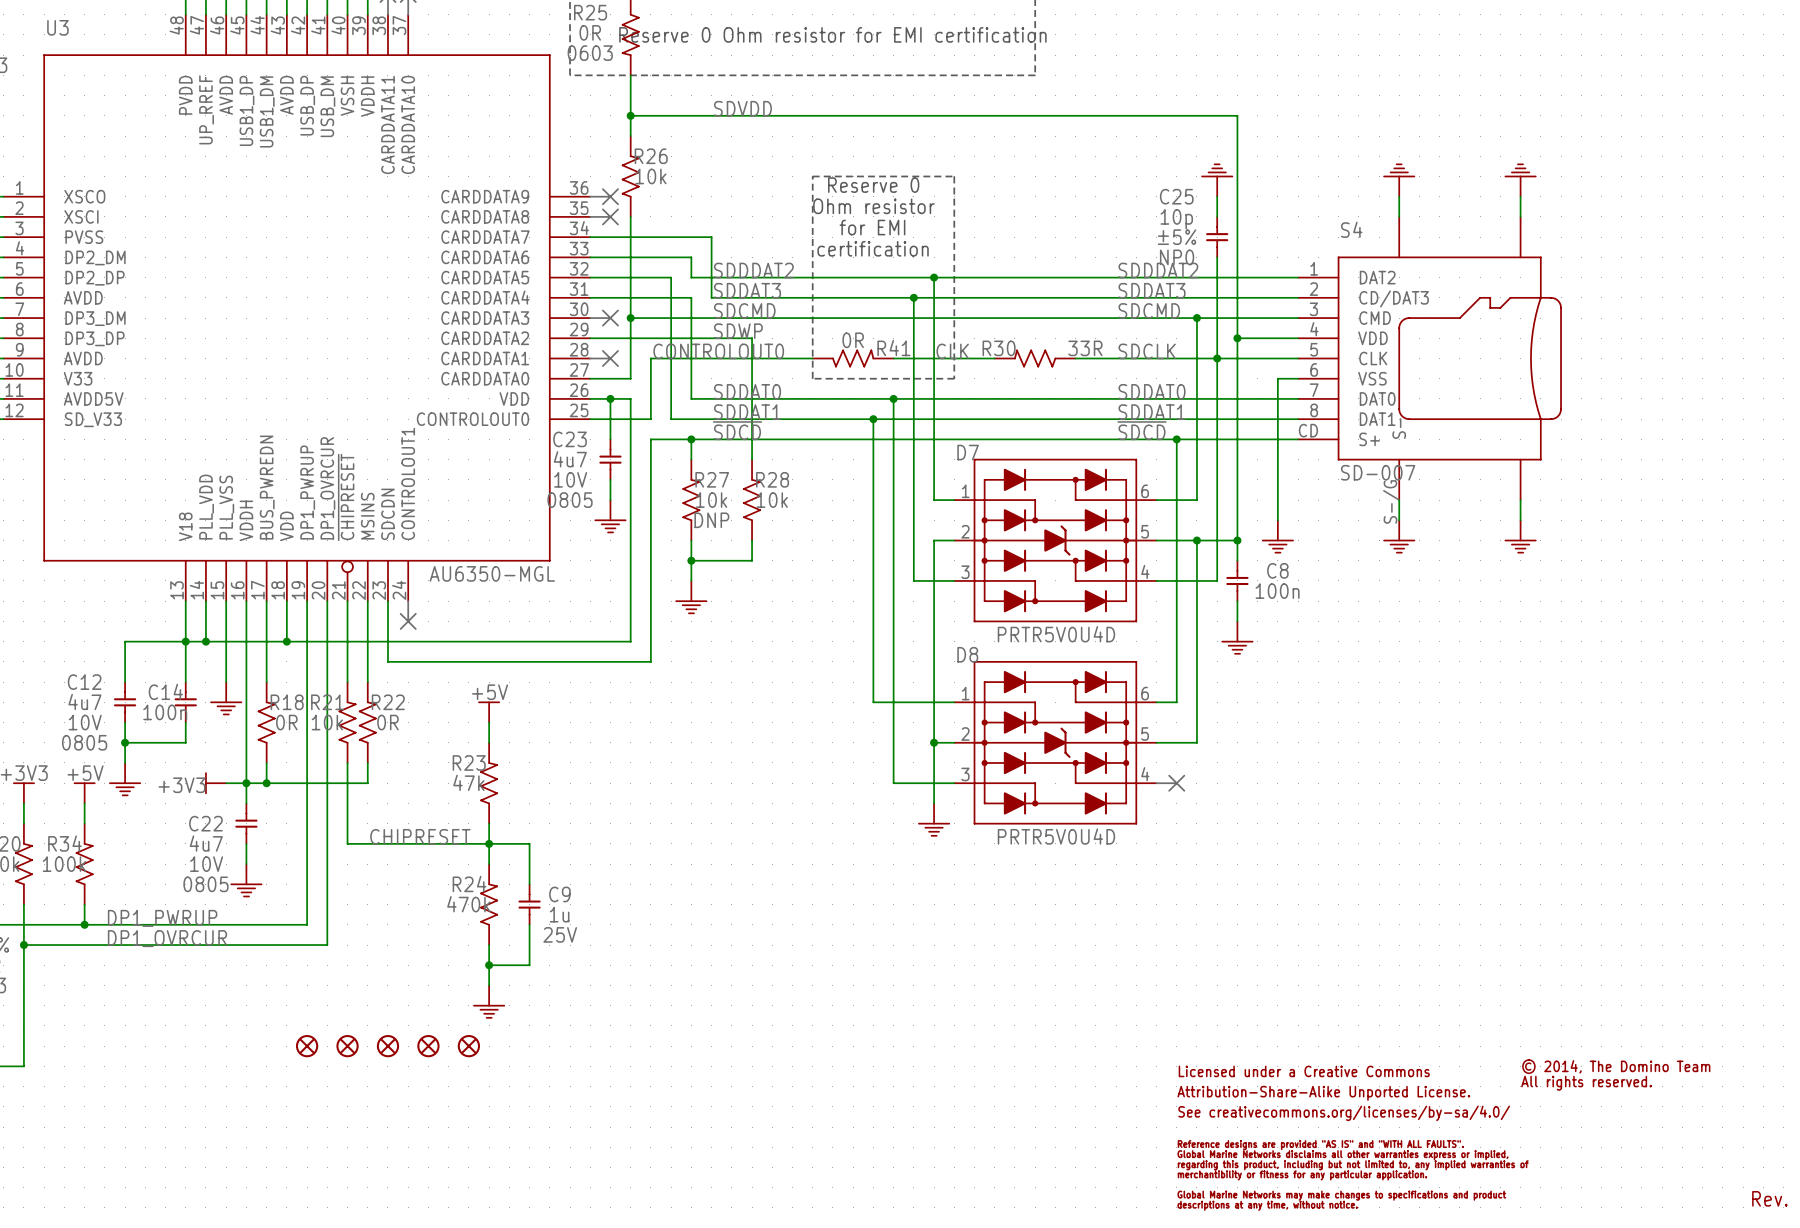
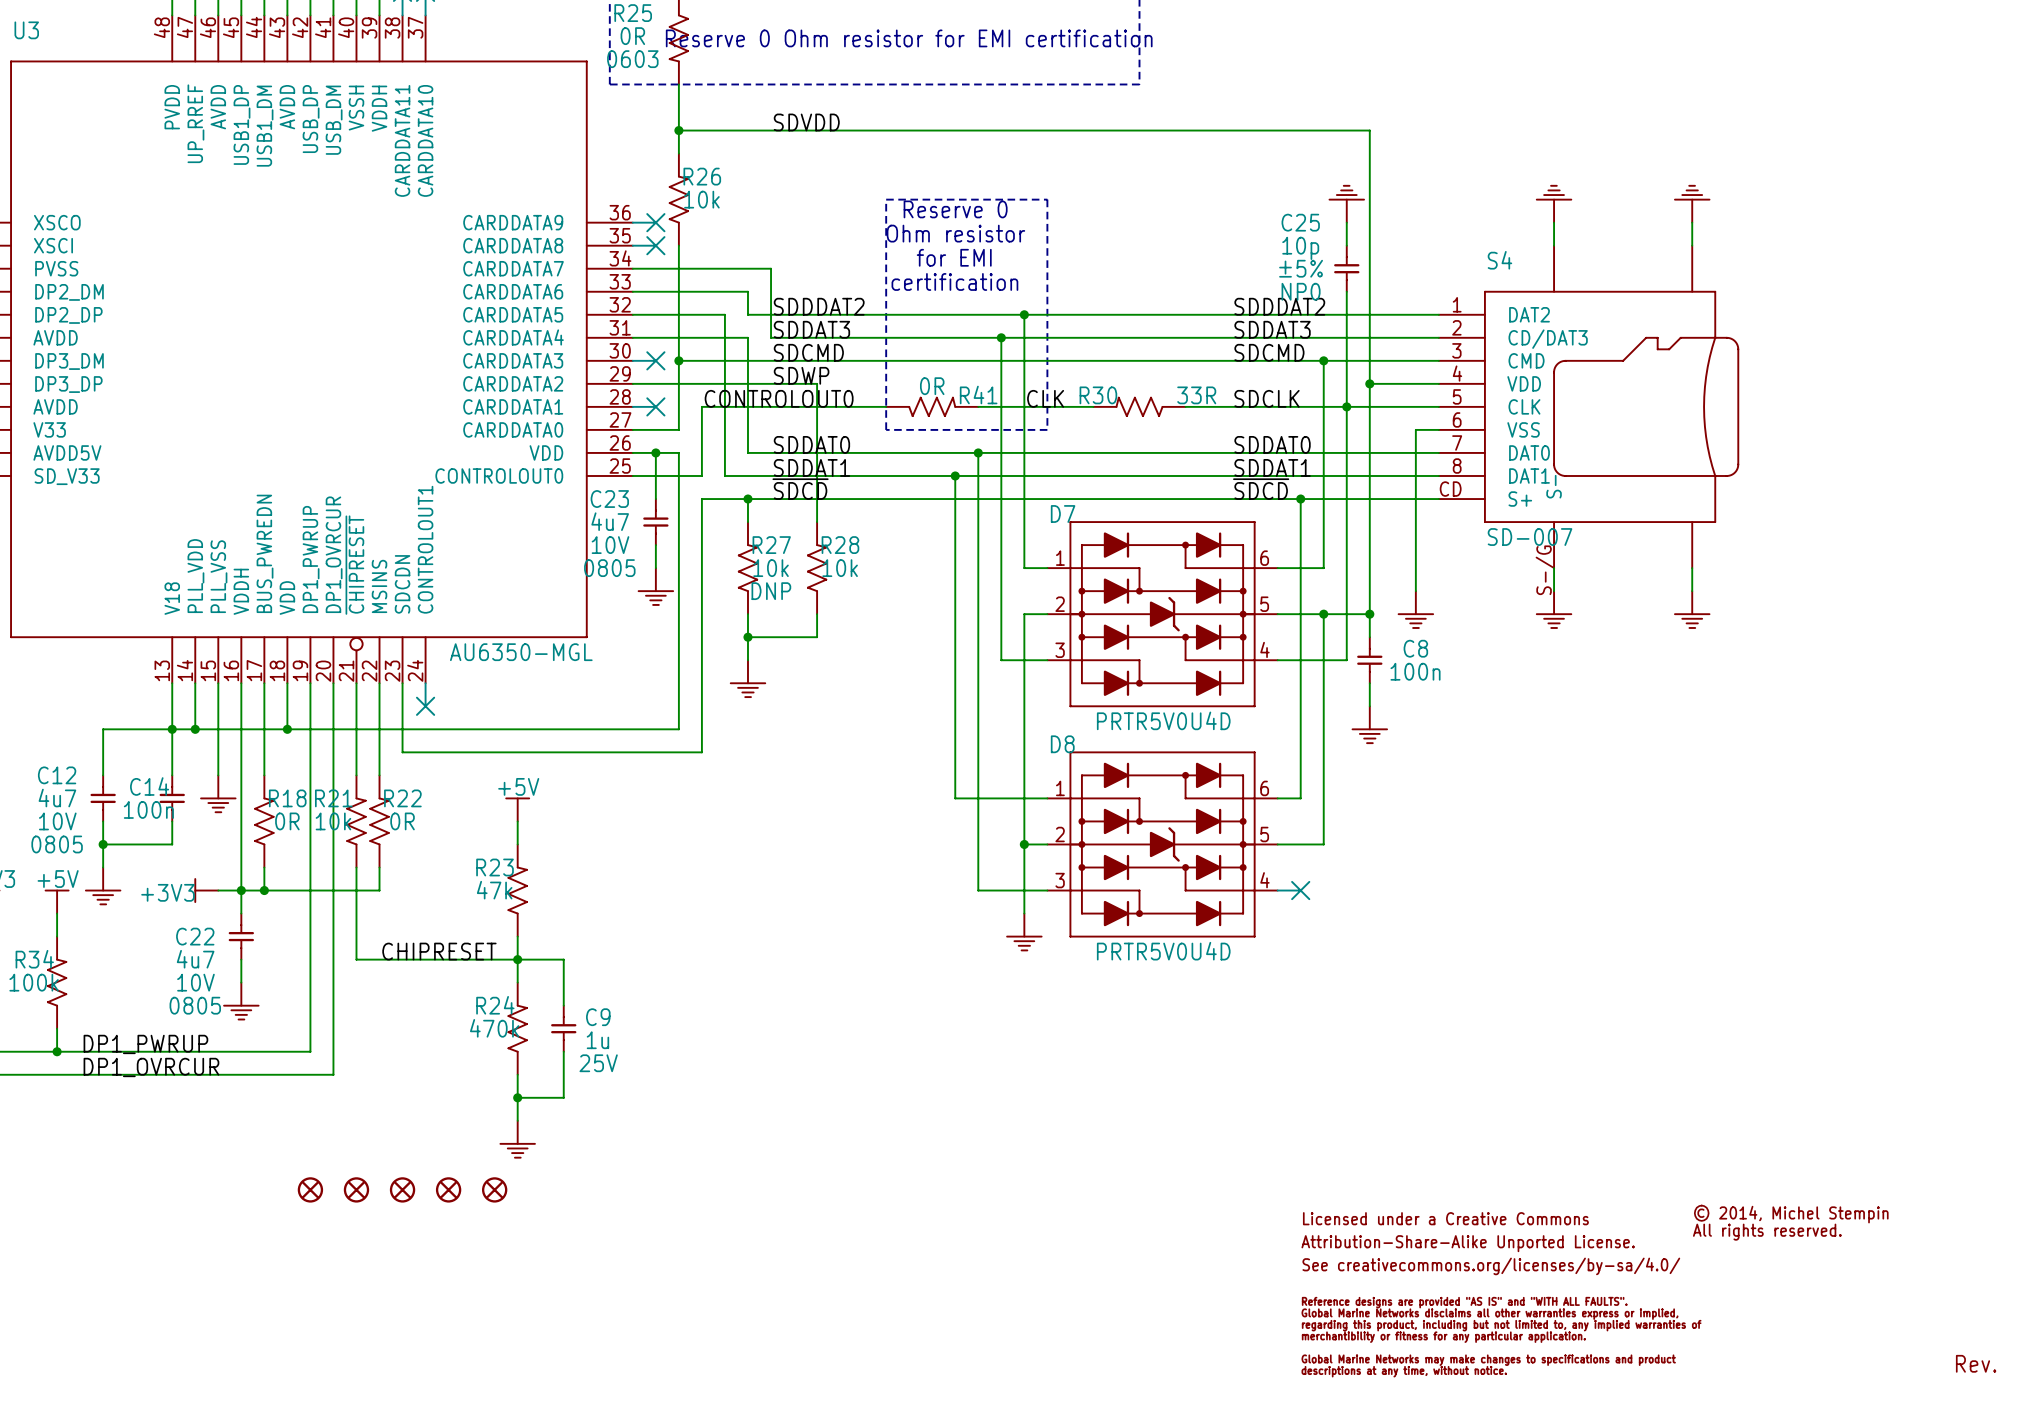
text: © 2014, The Domino Team (1616, 1066) -> © 2014, Michel Stempin (1791, 1214)

